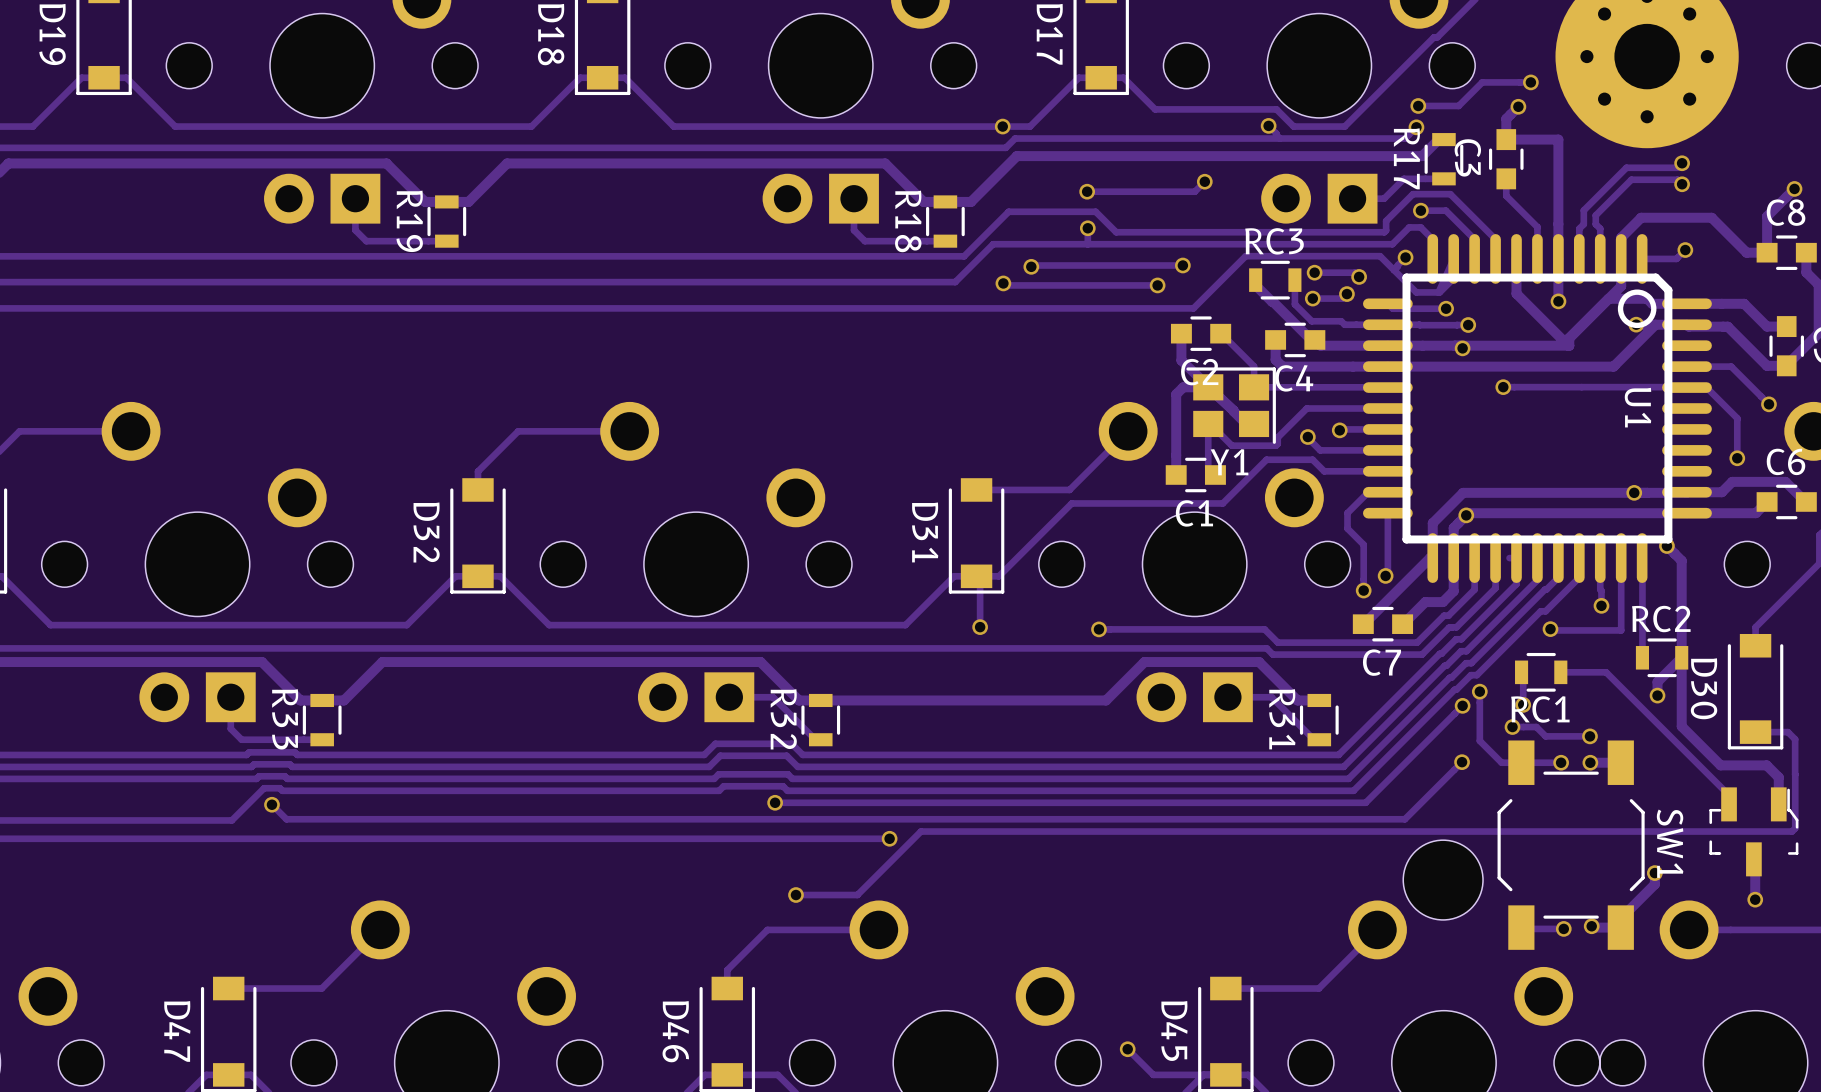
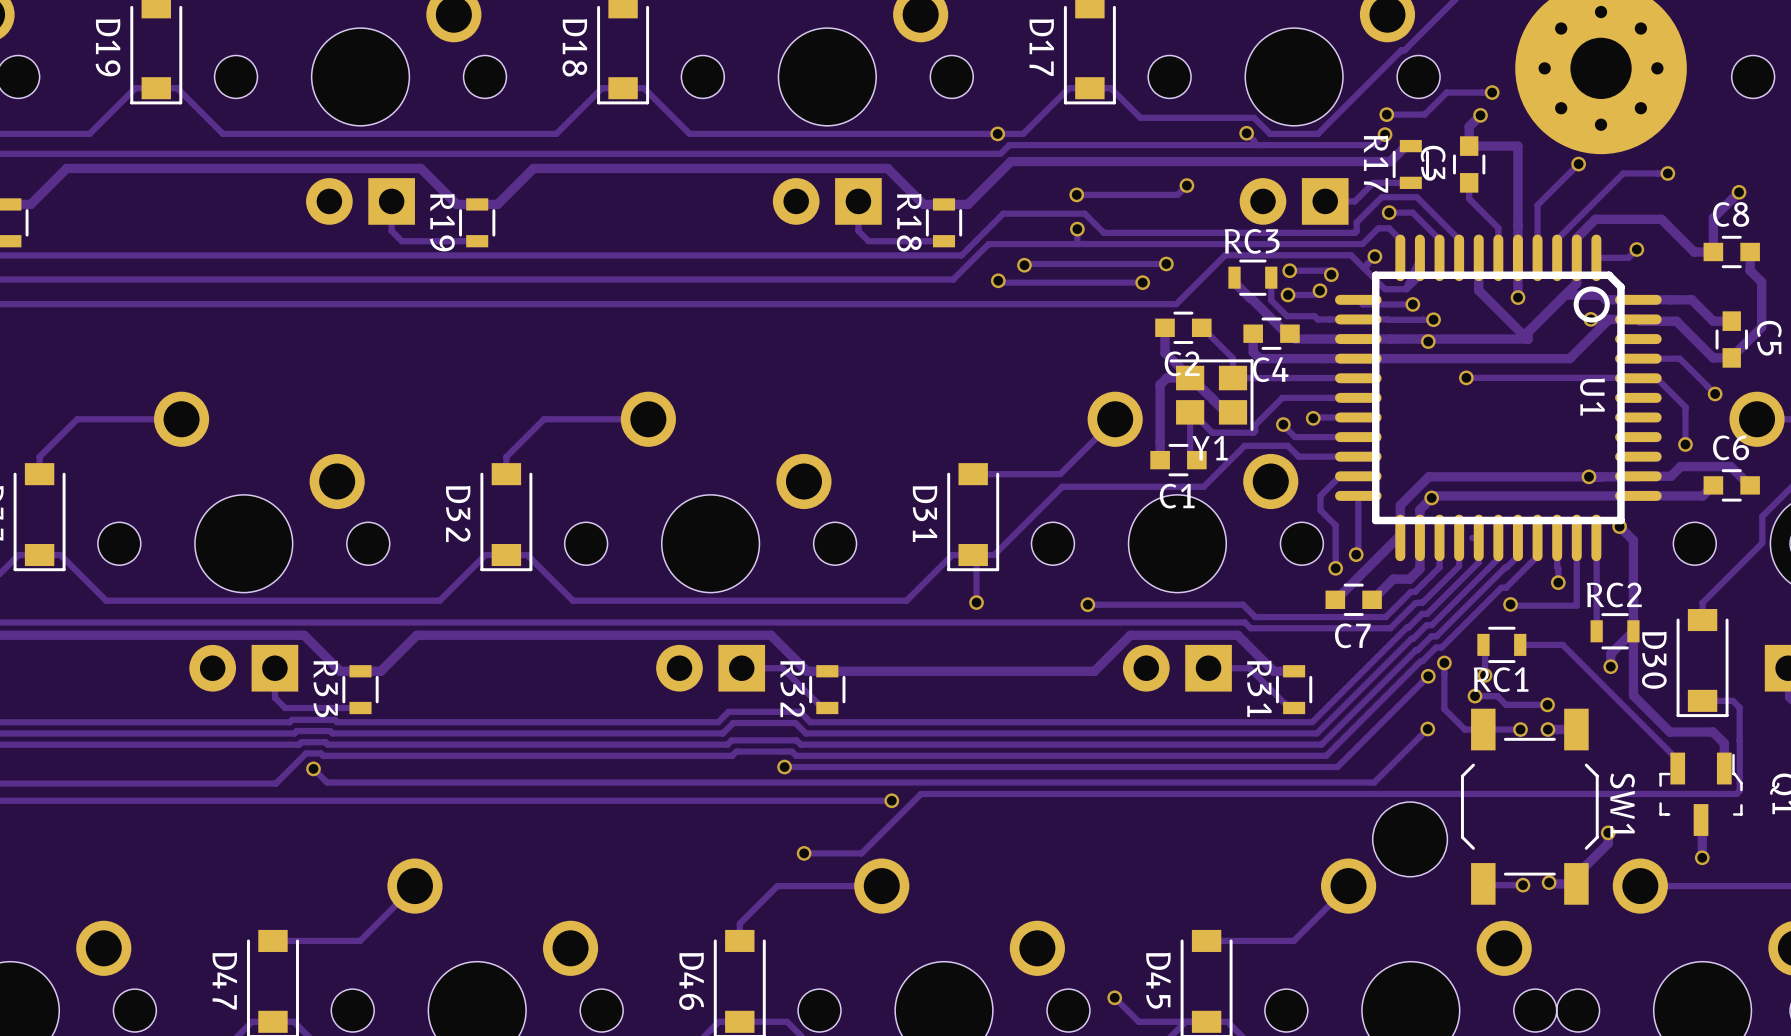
via: none -> (1578, 164)
track: (1682, 163) (1677, 167) (1626, 167) (1583, 210) (1583, 224) (1579, 228) -> (1578, 164) (1537, 205) (1537, 229)
via: (1682, 163) -> none
via: none -> (1667, 173)
track: (1682, 184) (1677, 179) (1631, 179) (1595, 215) (1595, 224) (1600, 228) (1600, 239) -> (1667, 173) (1623, 173) (1557, 239)
via: (1682, 184) -> none

